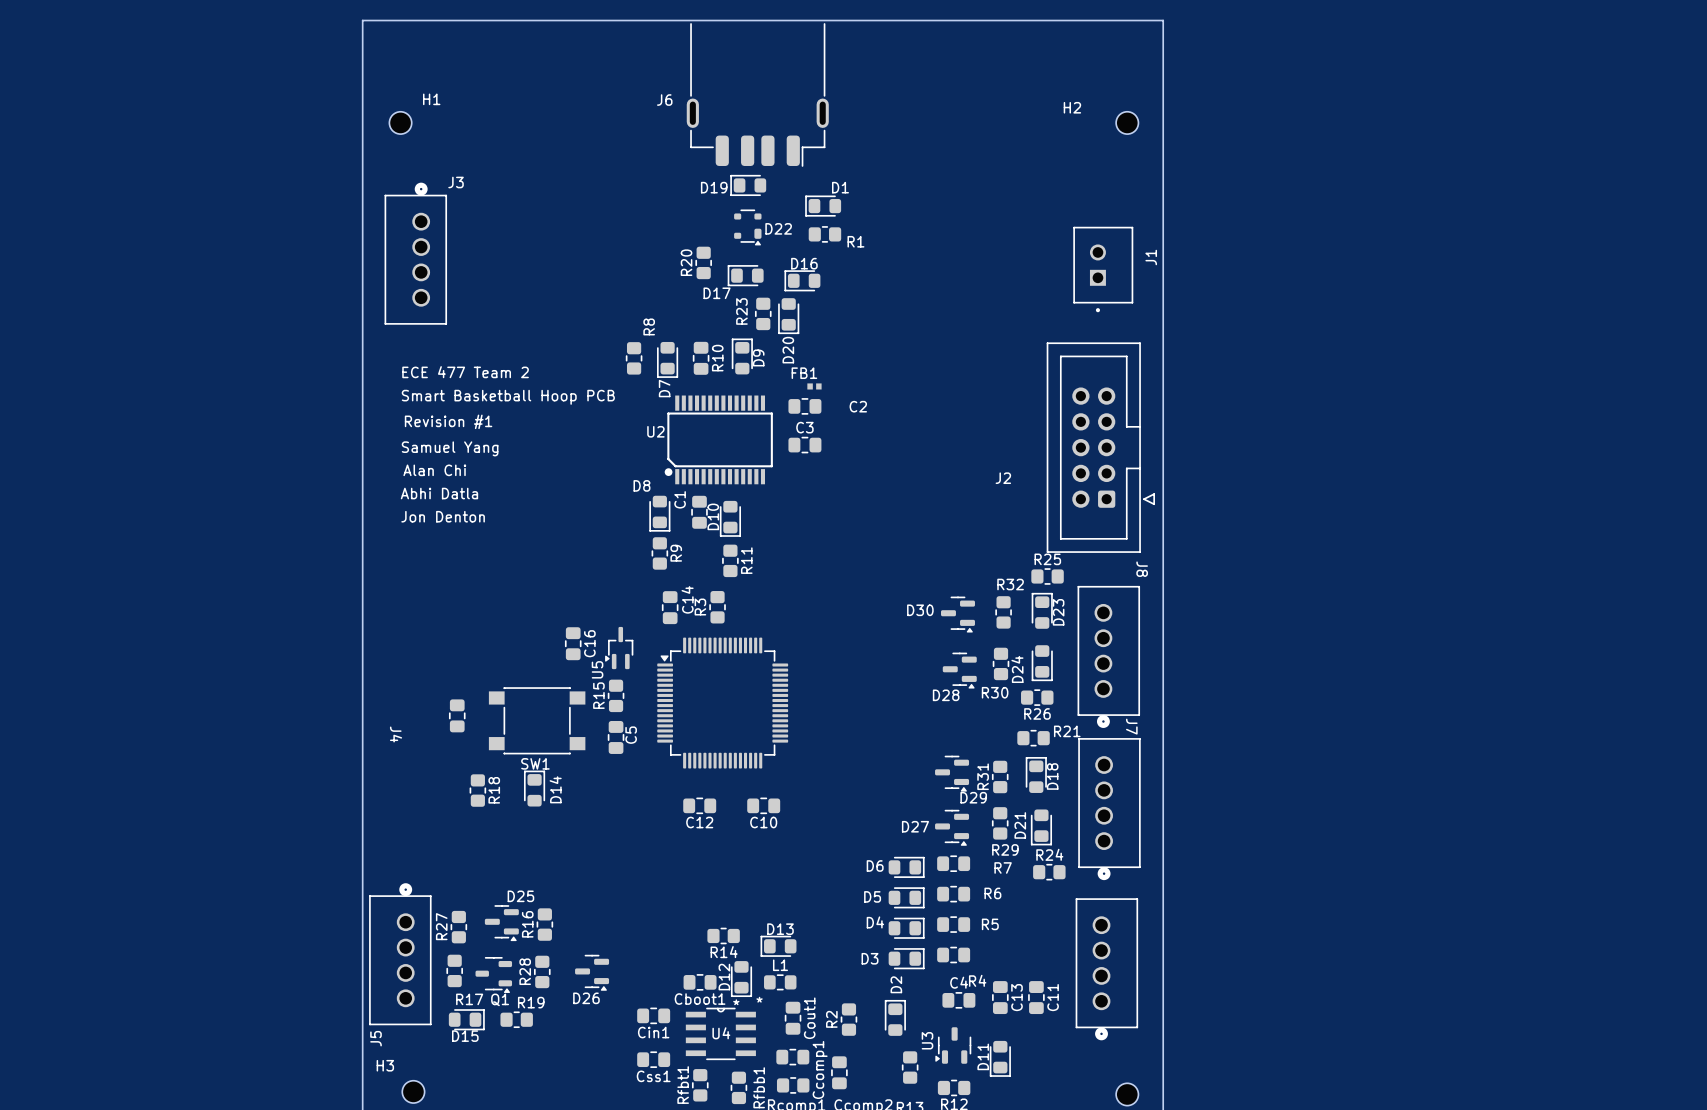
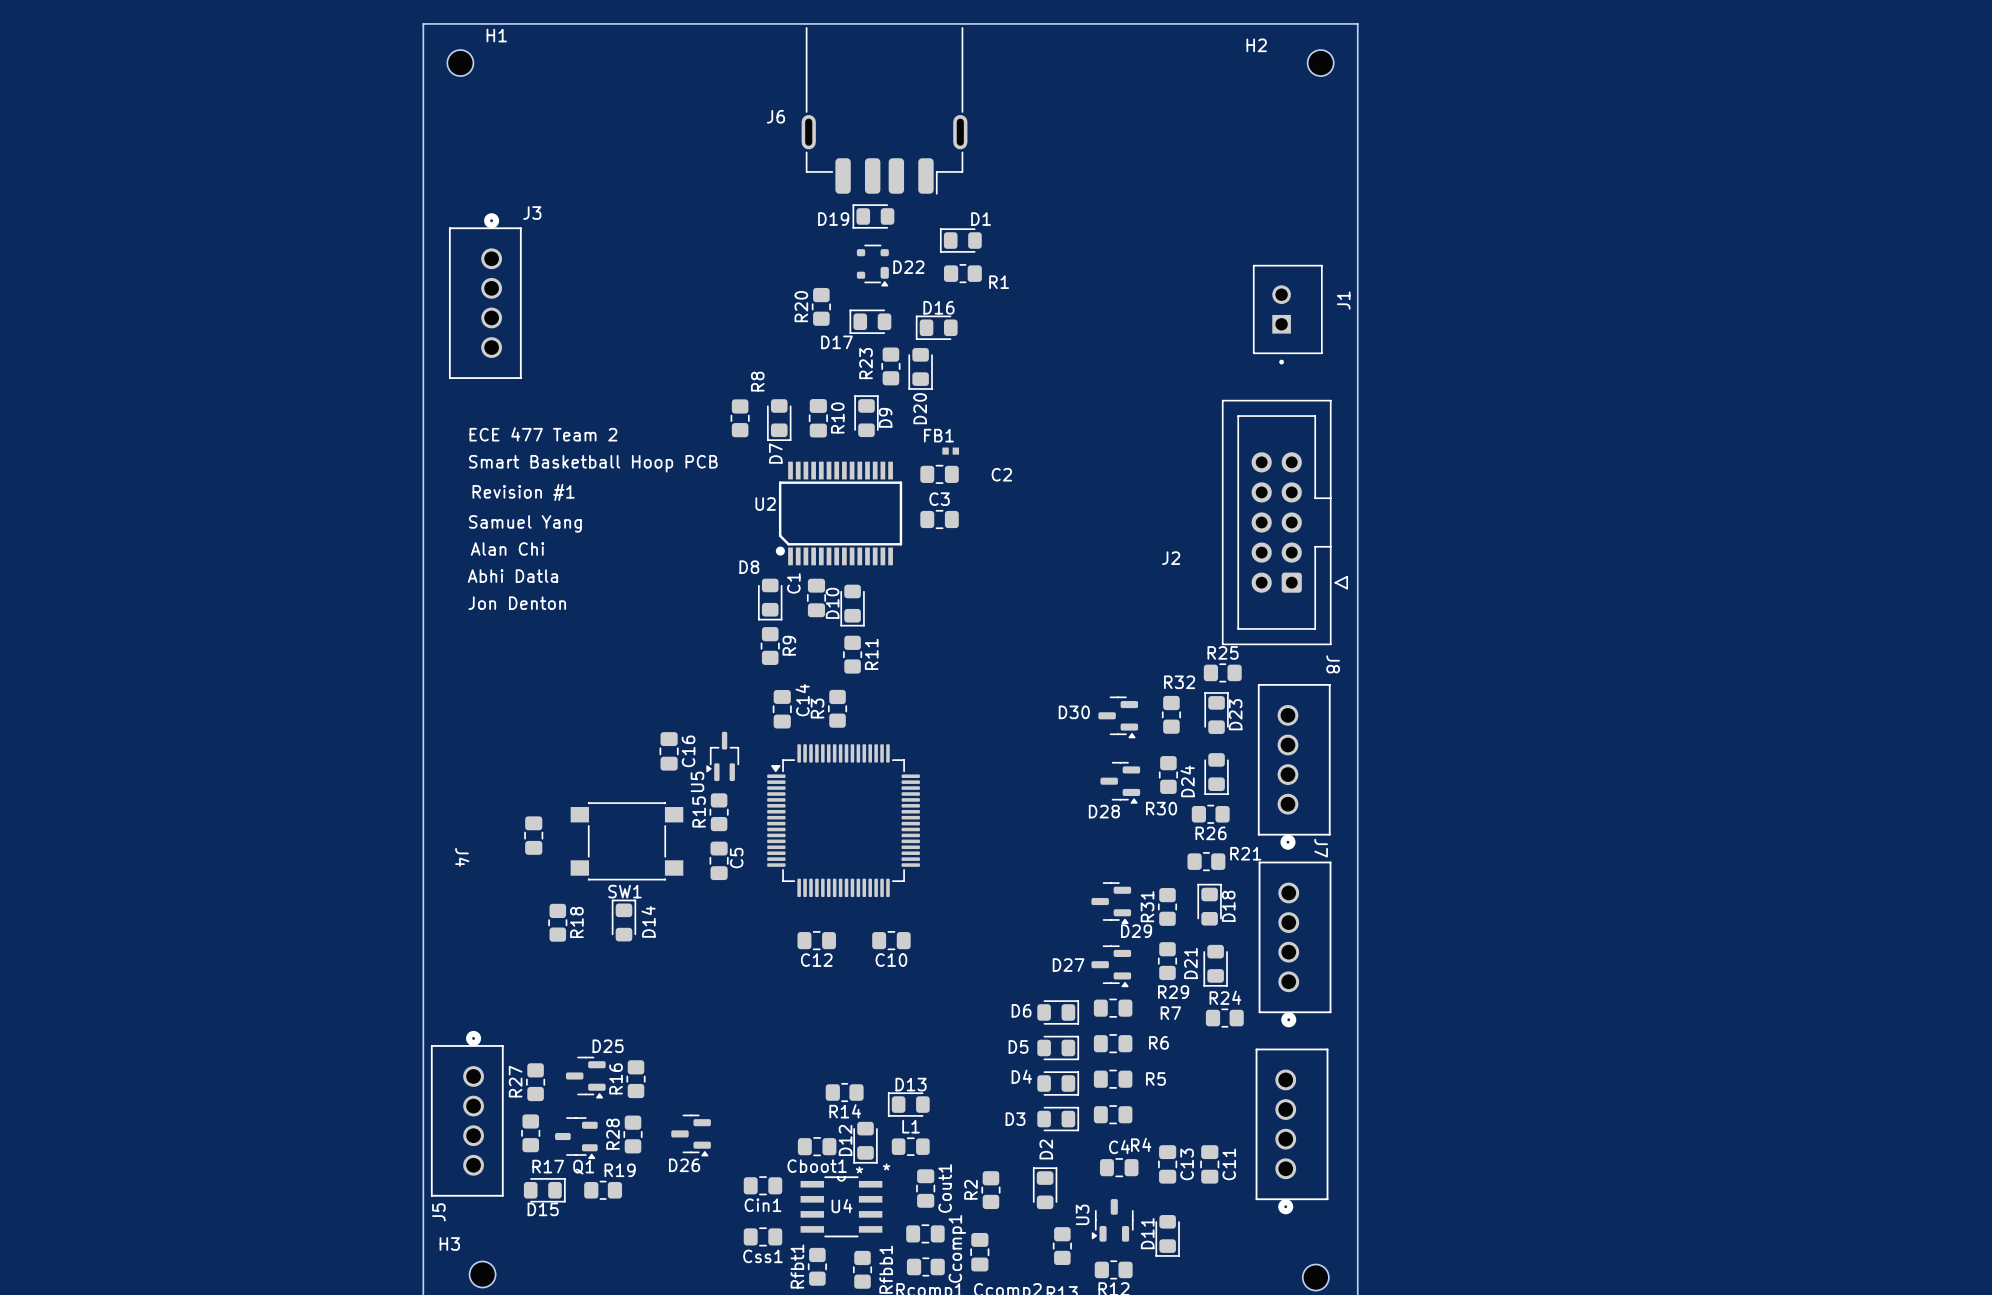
H1 position: (400, 122) -> (460, 63)
H2 position: (1127, 122) -> (1320, 63)

